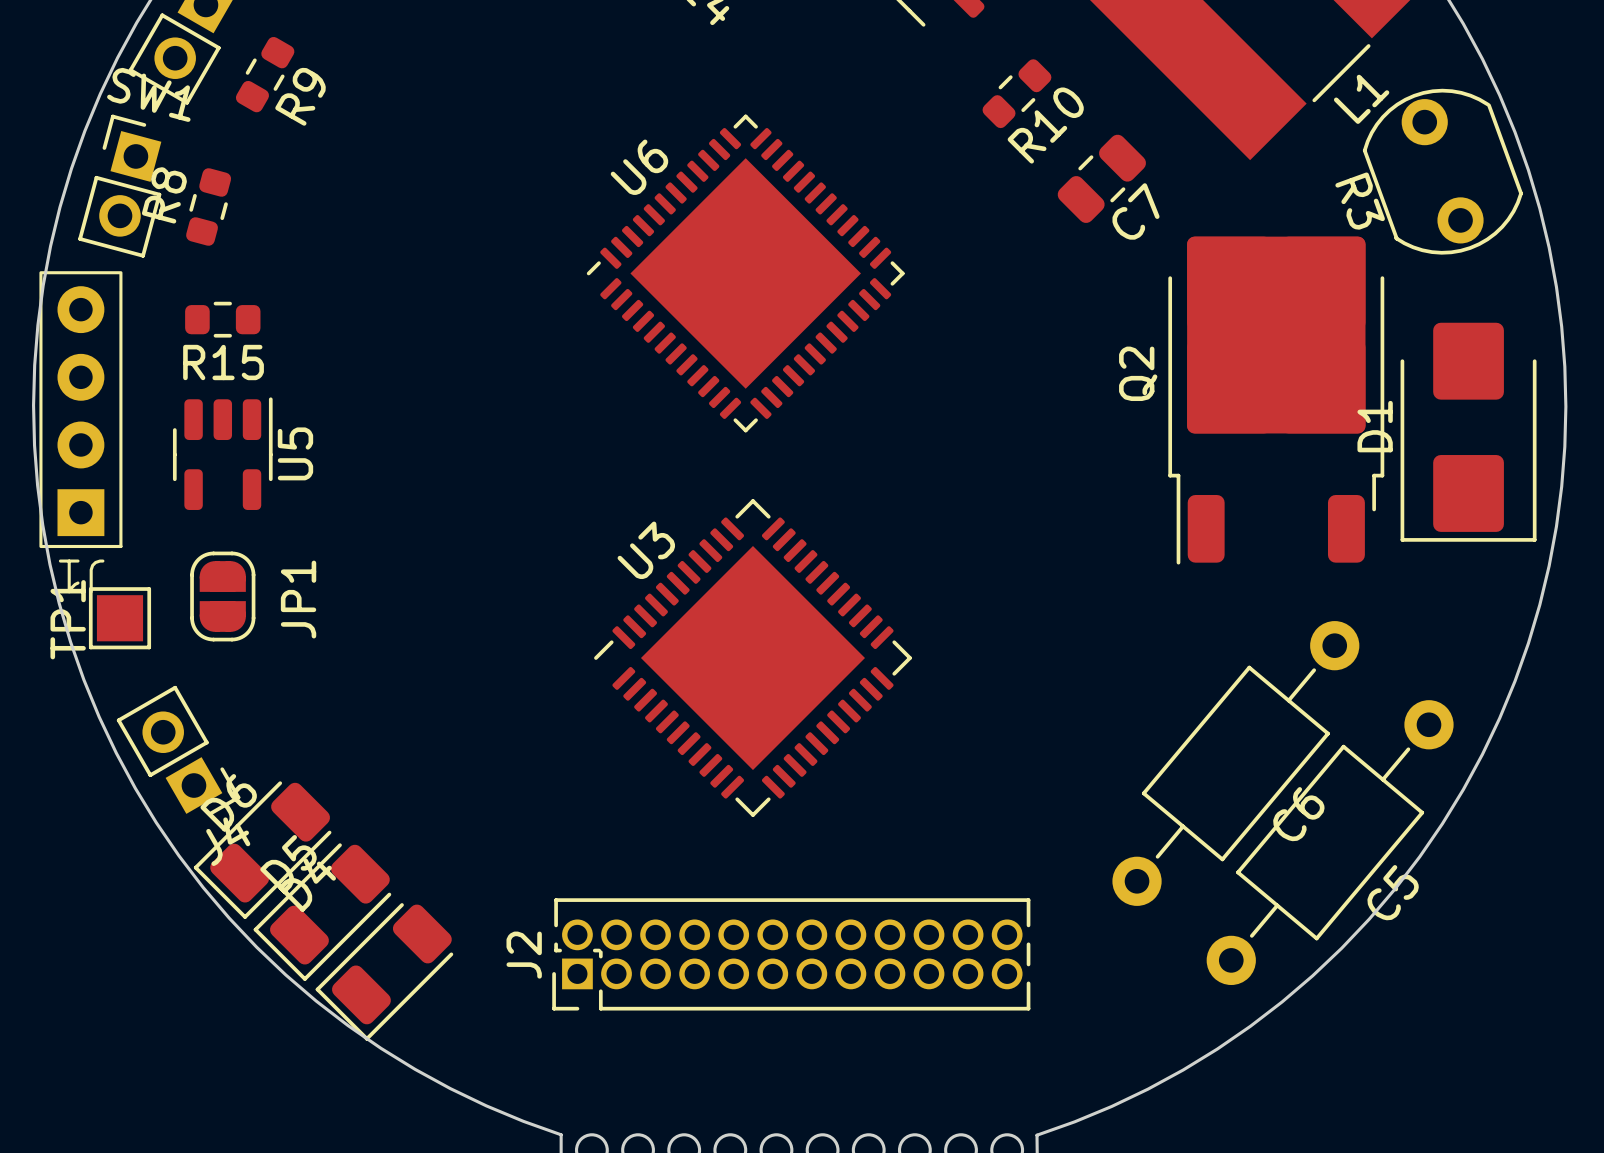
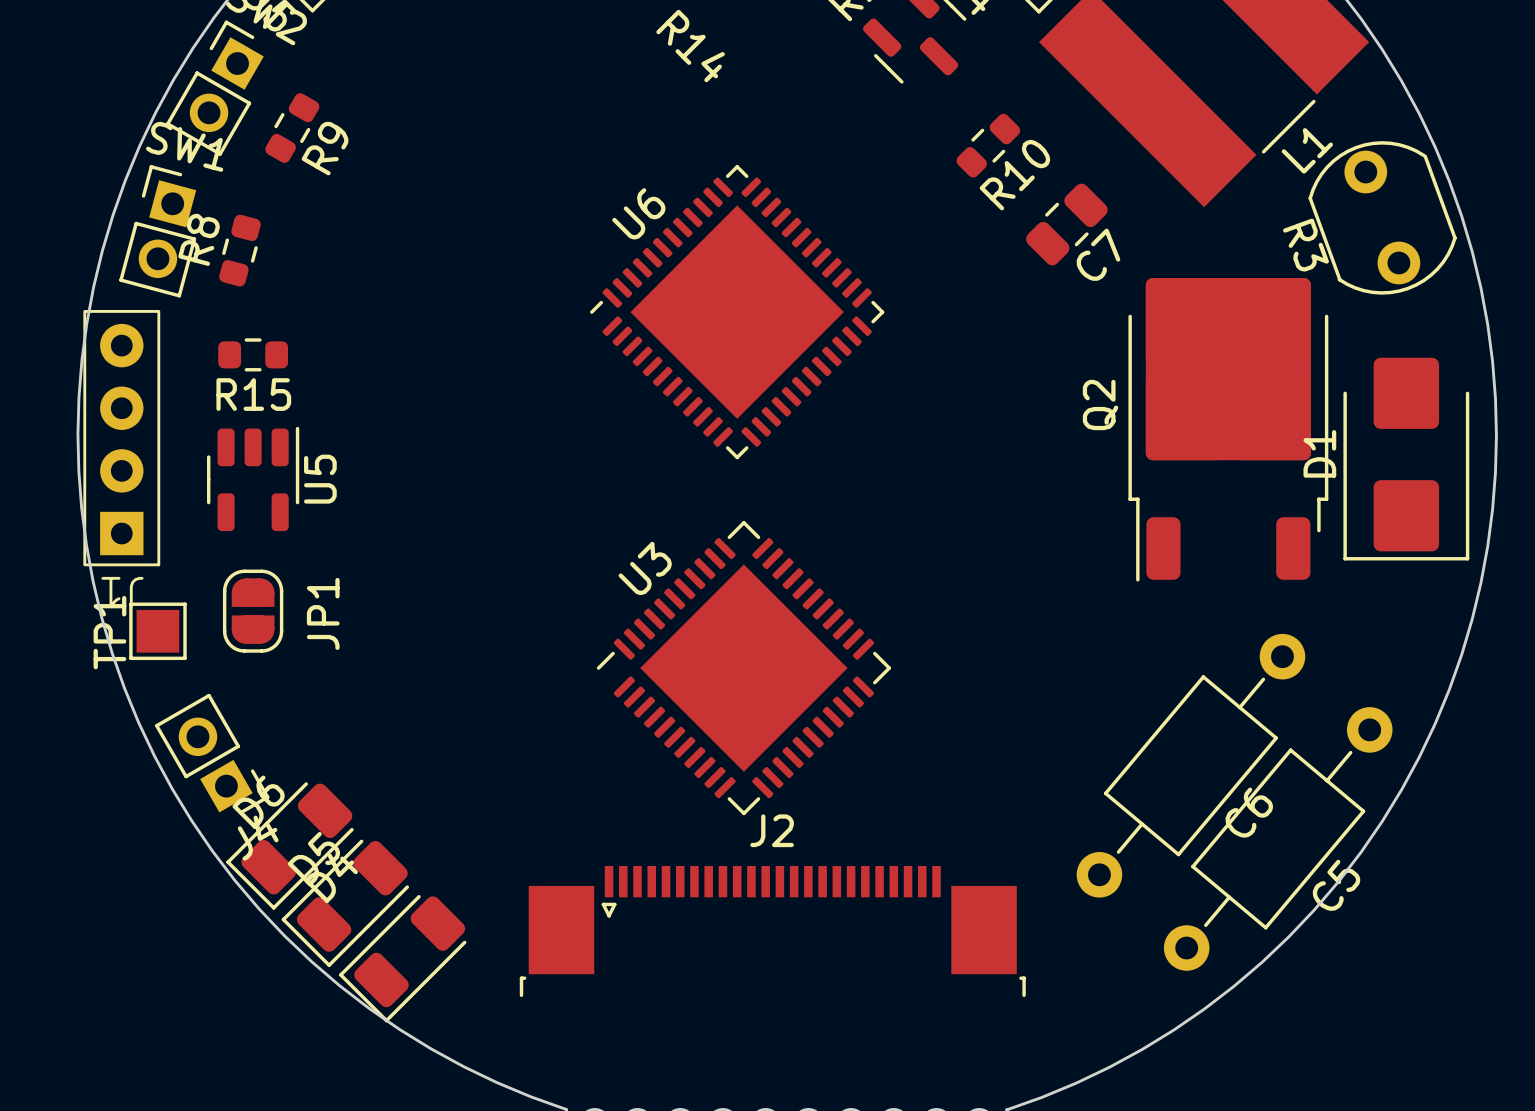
J2 footprint: [552, 898, 1031, 1011] -> [519, 866, 1026, 997]
J2 name position: J2 (524, 955) -> J2 (772, 830)

